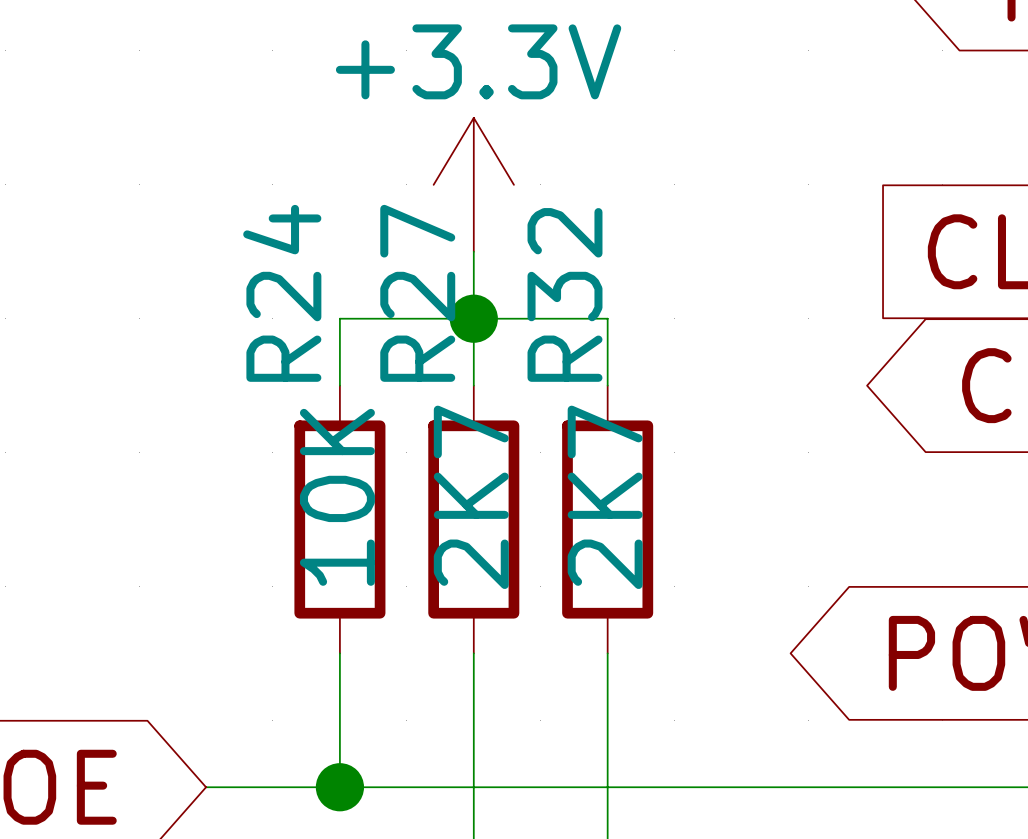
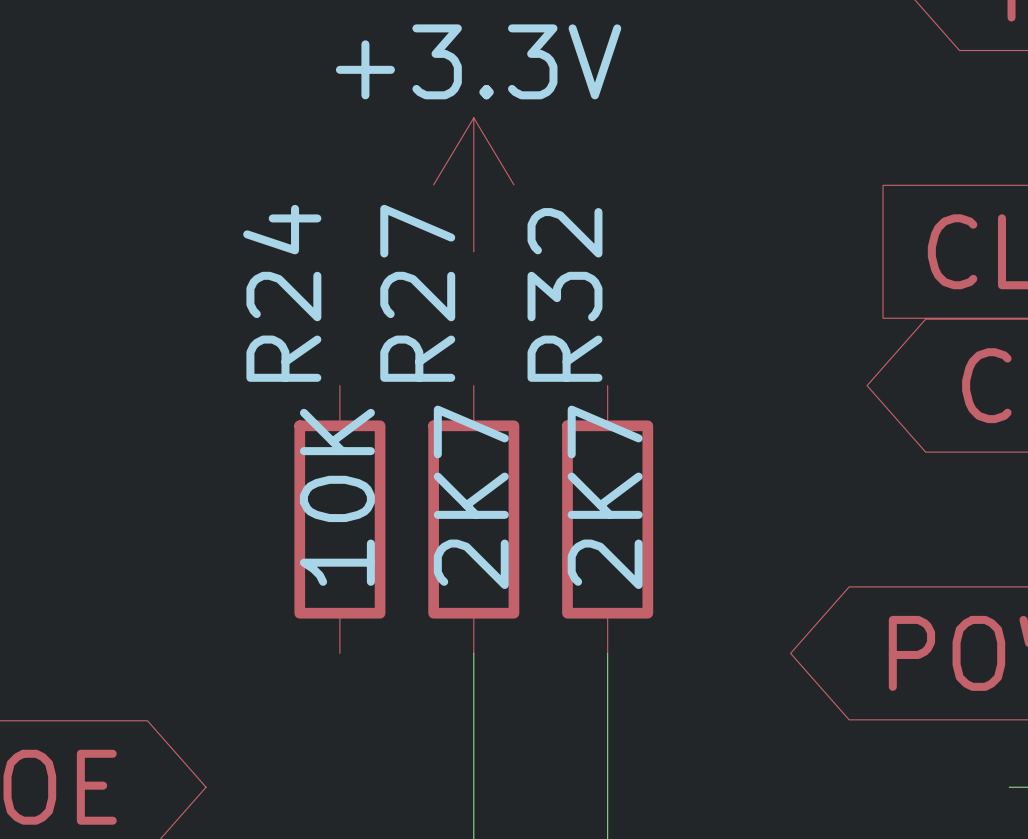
wire: (473, 251) (473, 385) -> none
junction: (473, 318) -> none
wire: (339, 385) (339, 318) (607, 318) (607, 385) -> none
wire: (339, 653) (339, 787) -> none
wire: (206, 787) (1009, 787) -> none
junction: (339, 787) -> none

